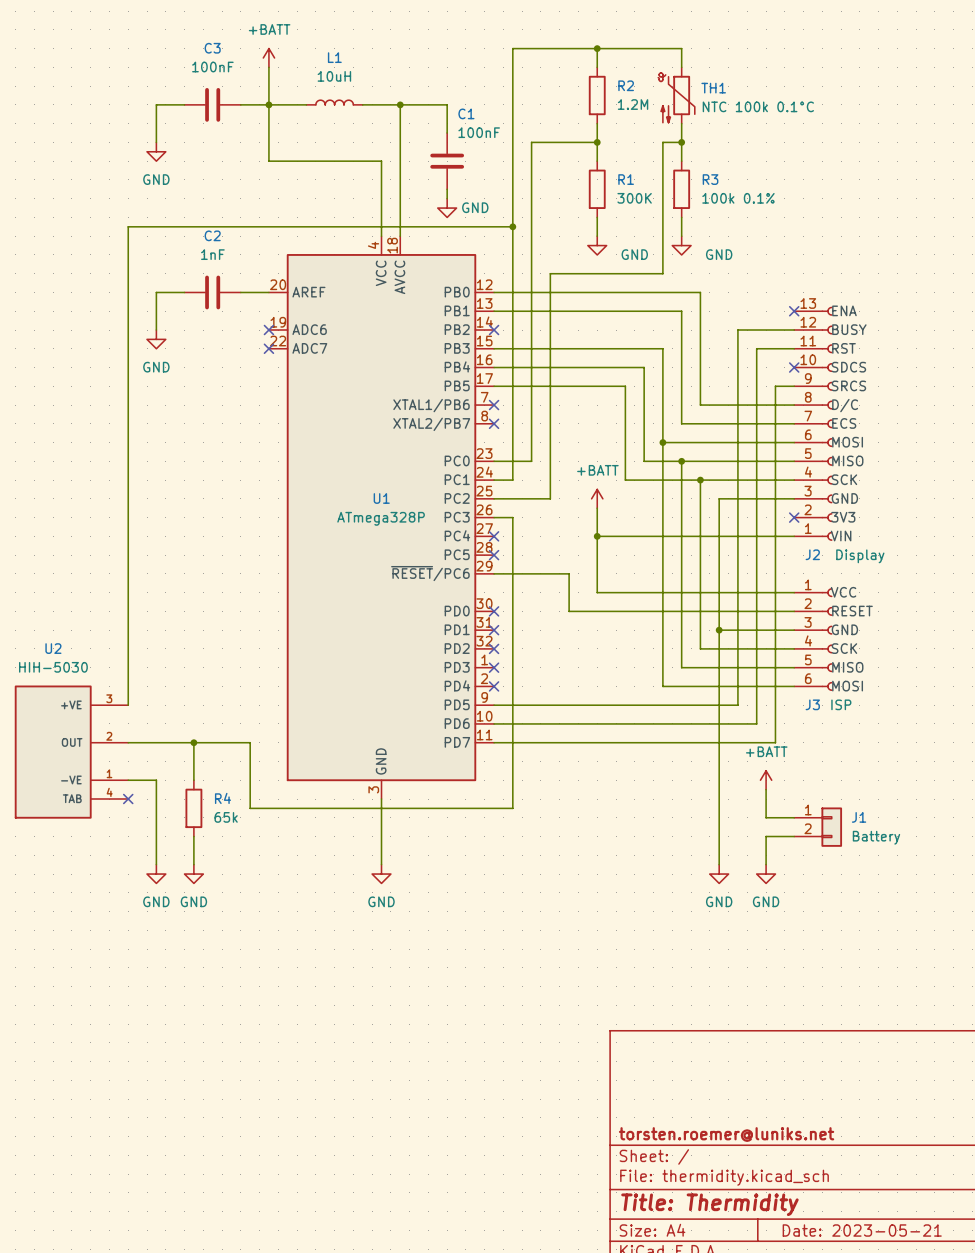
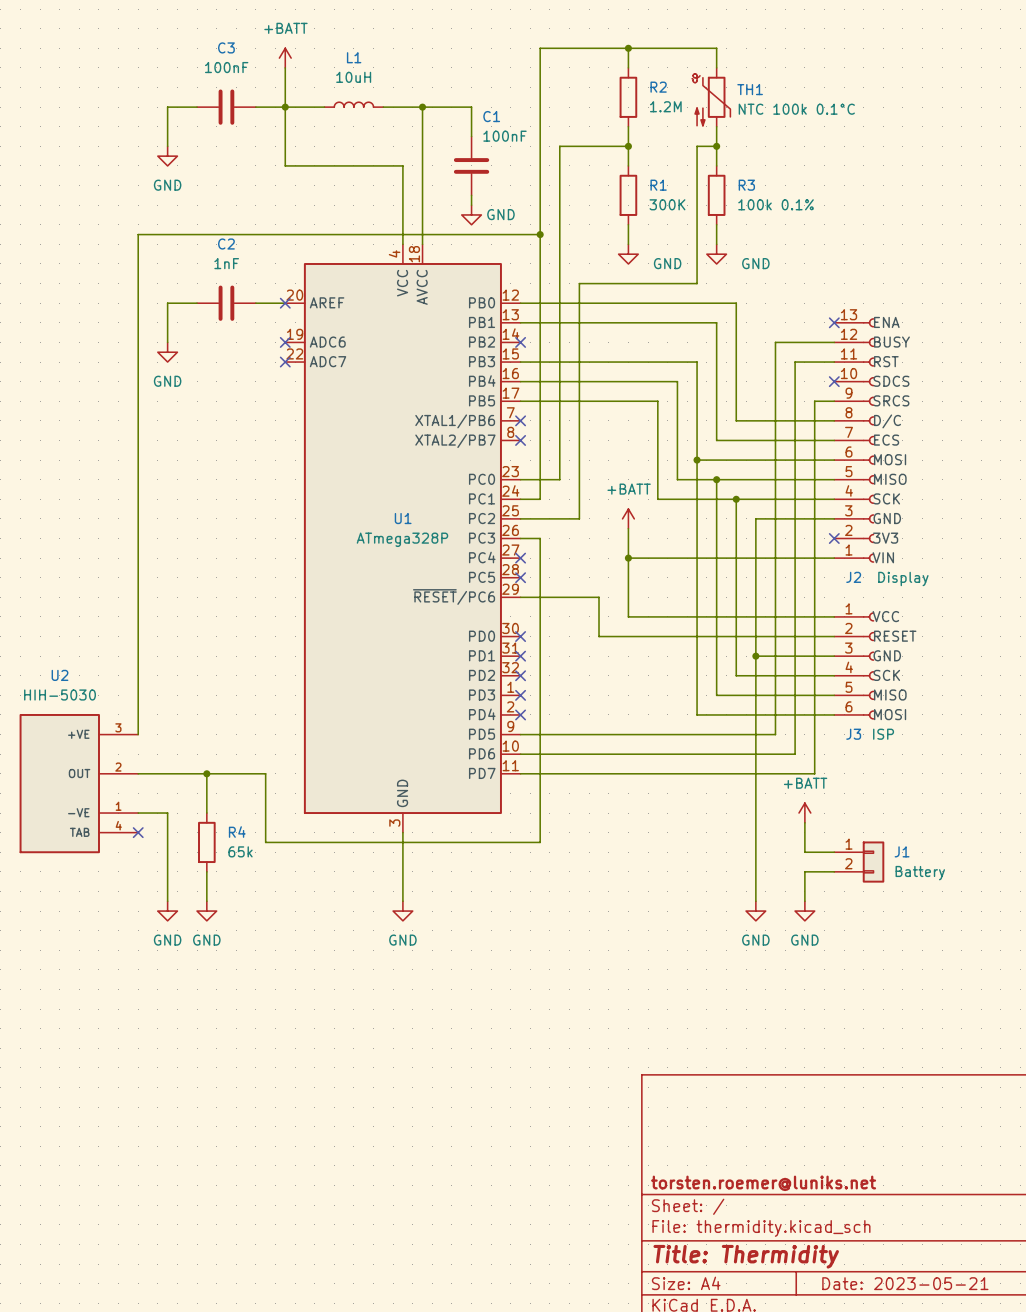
no-connect mark: none -> (285, 303)

